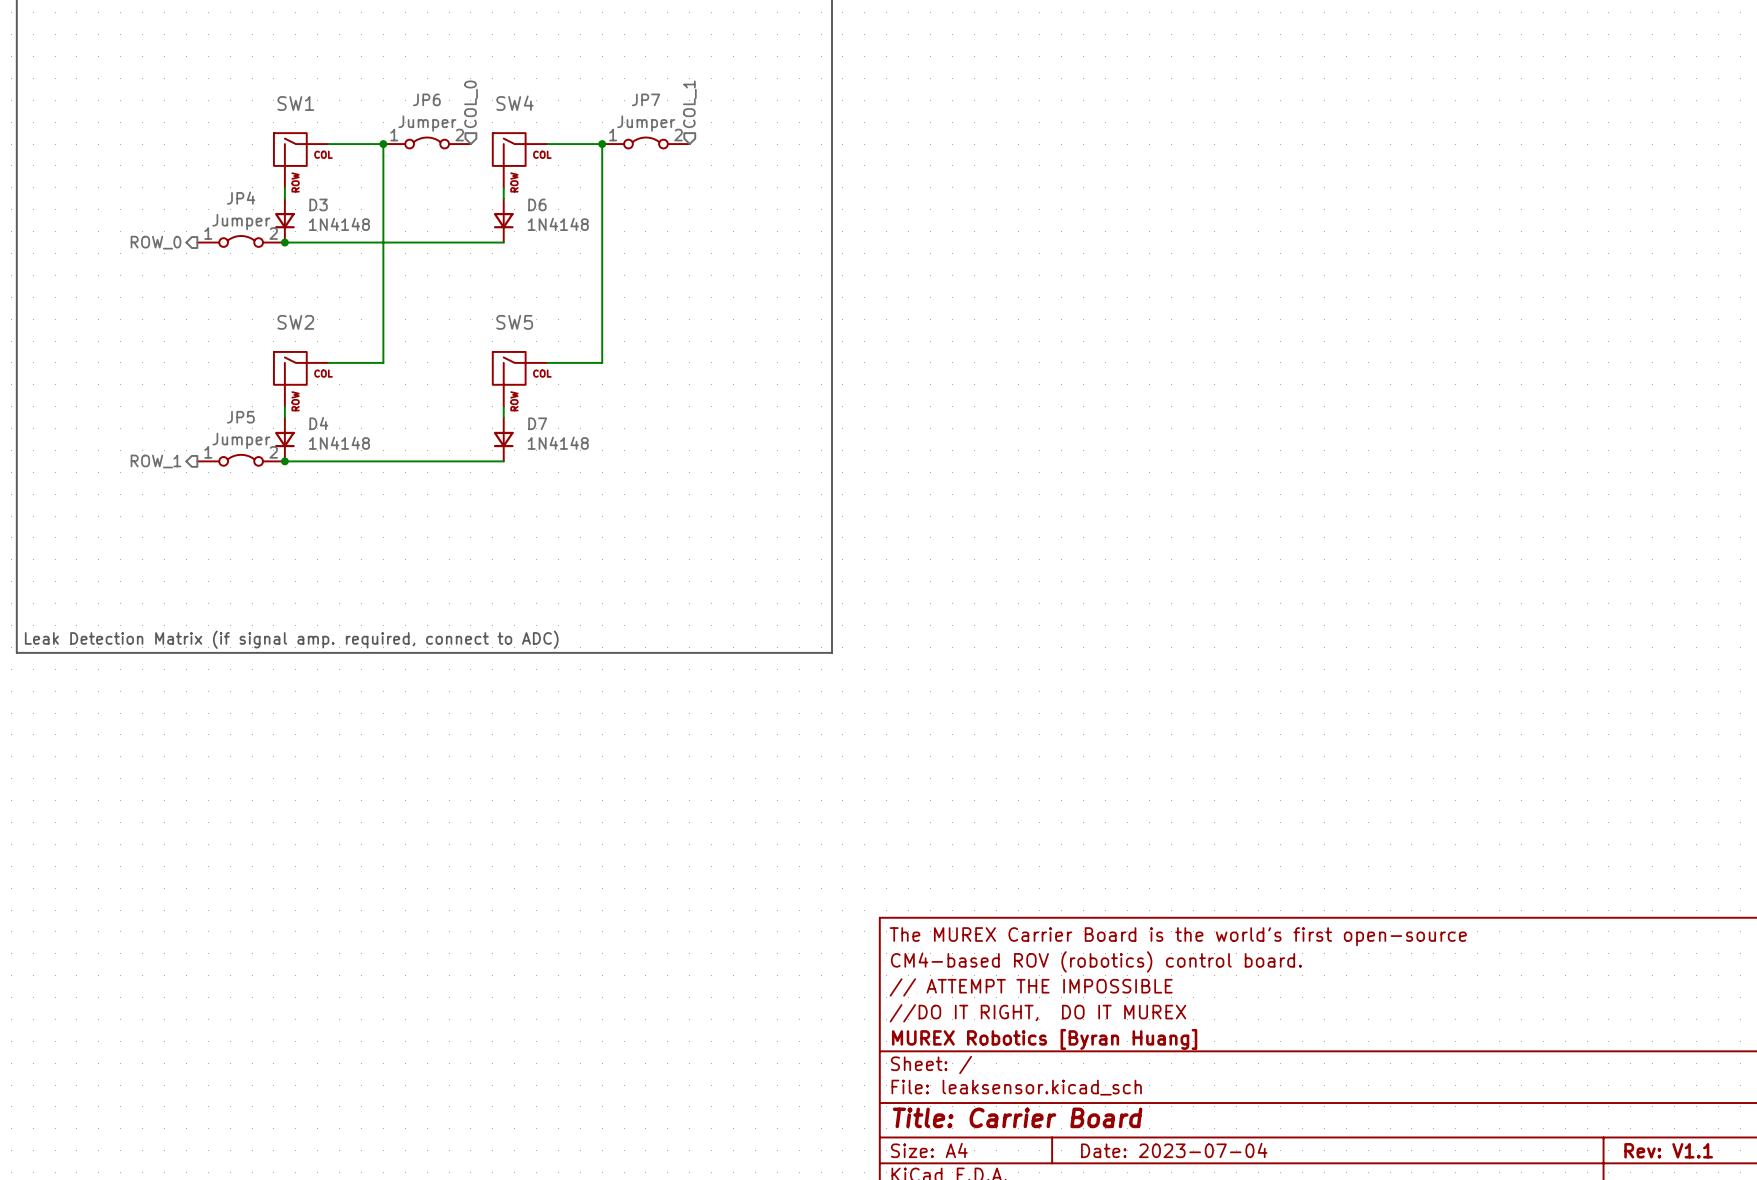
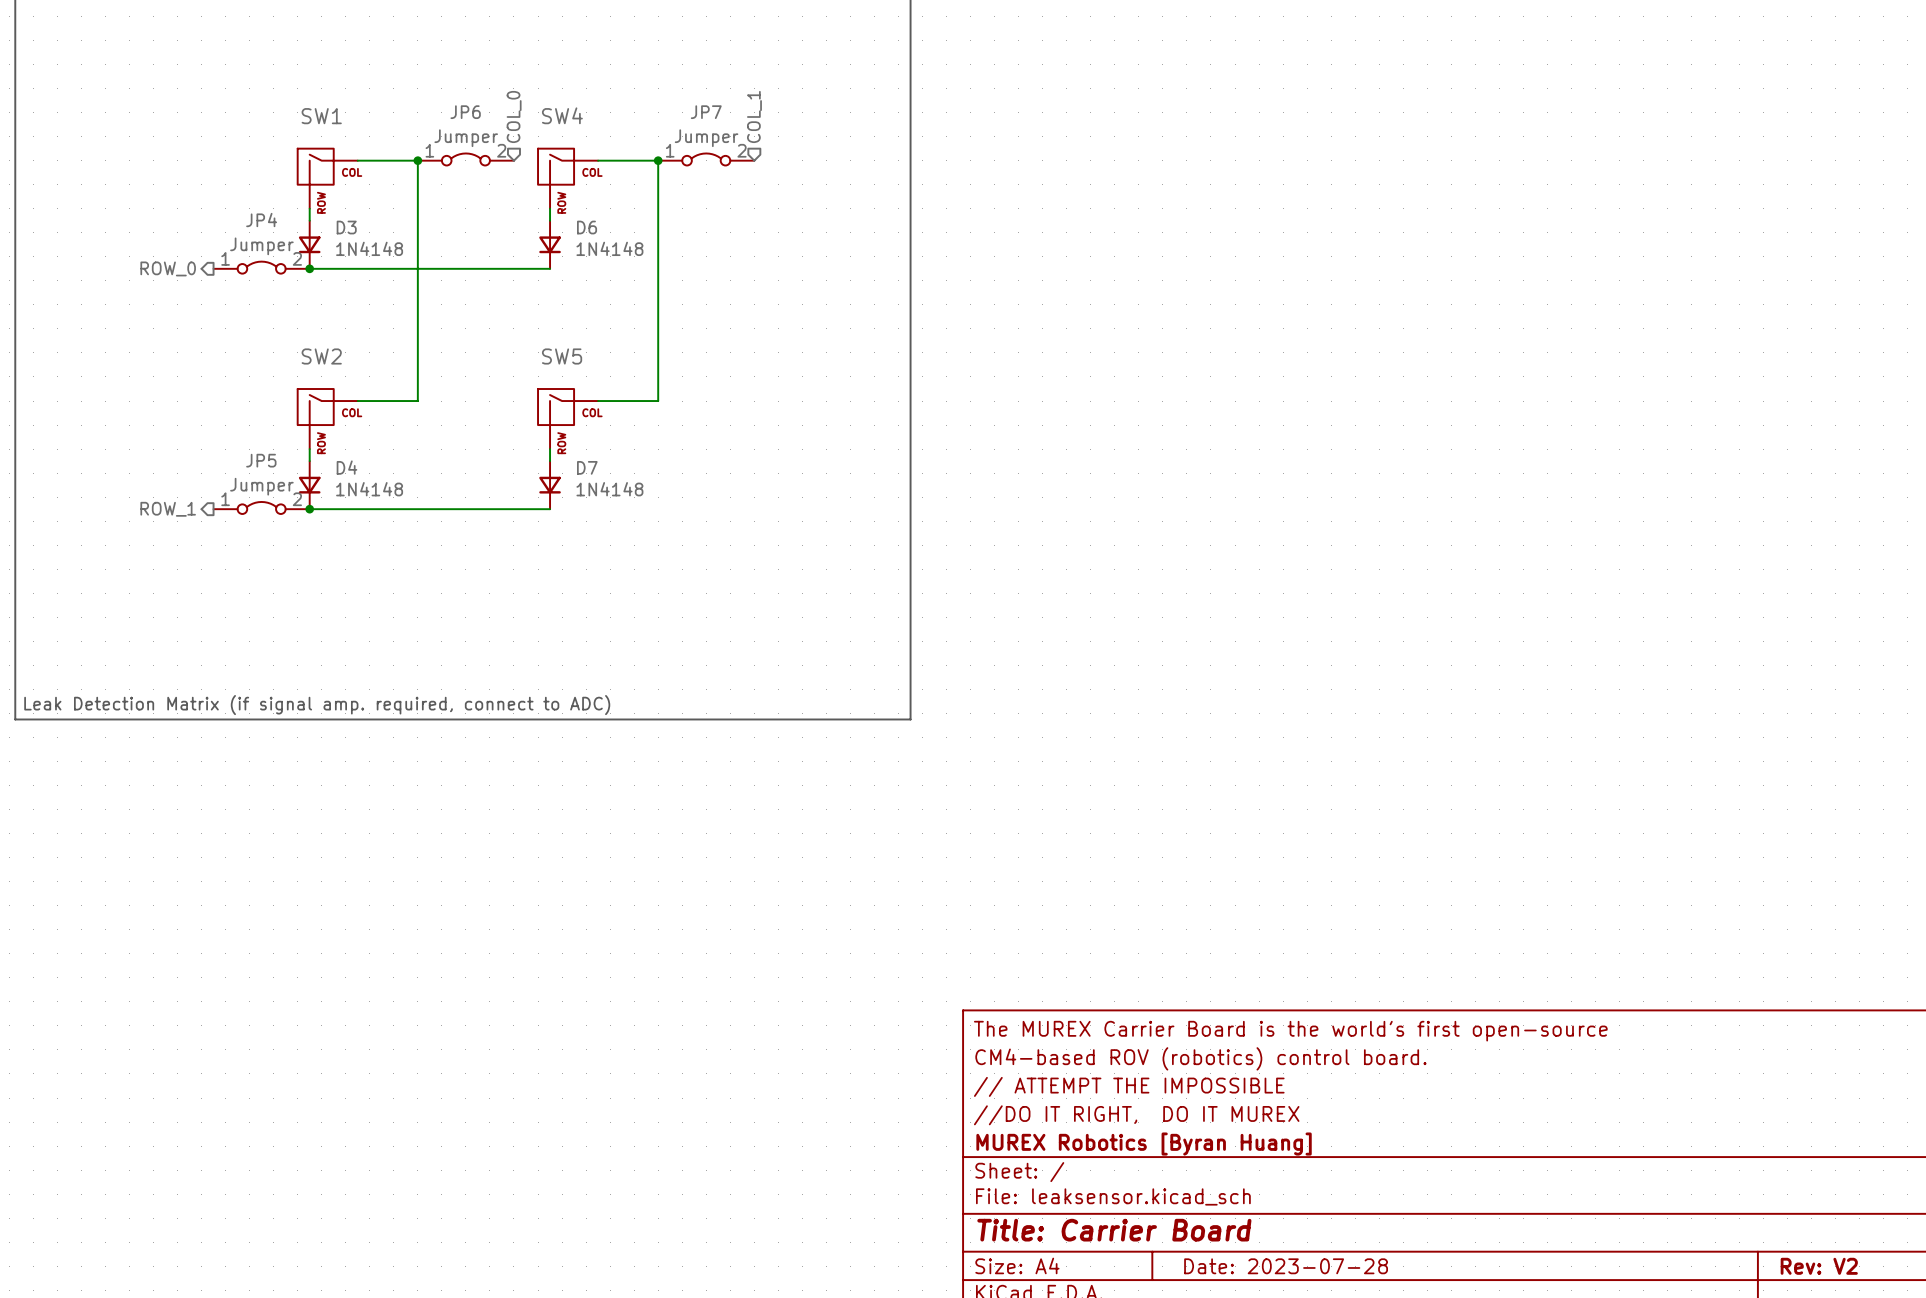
title block: Date: 2023-07-04 (1174, 1150) -> Date: 2023-07-28 (1286, 1266)
title block: Rev: V1.1 (1668, 1150) -> Rev: V2 (1819, 1266)

